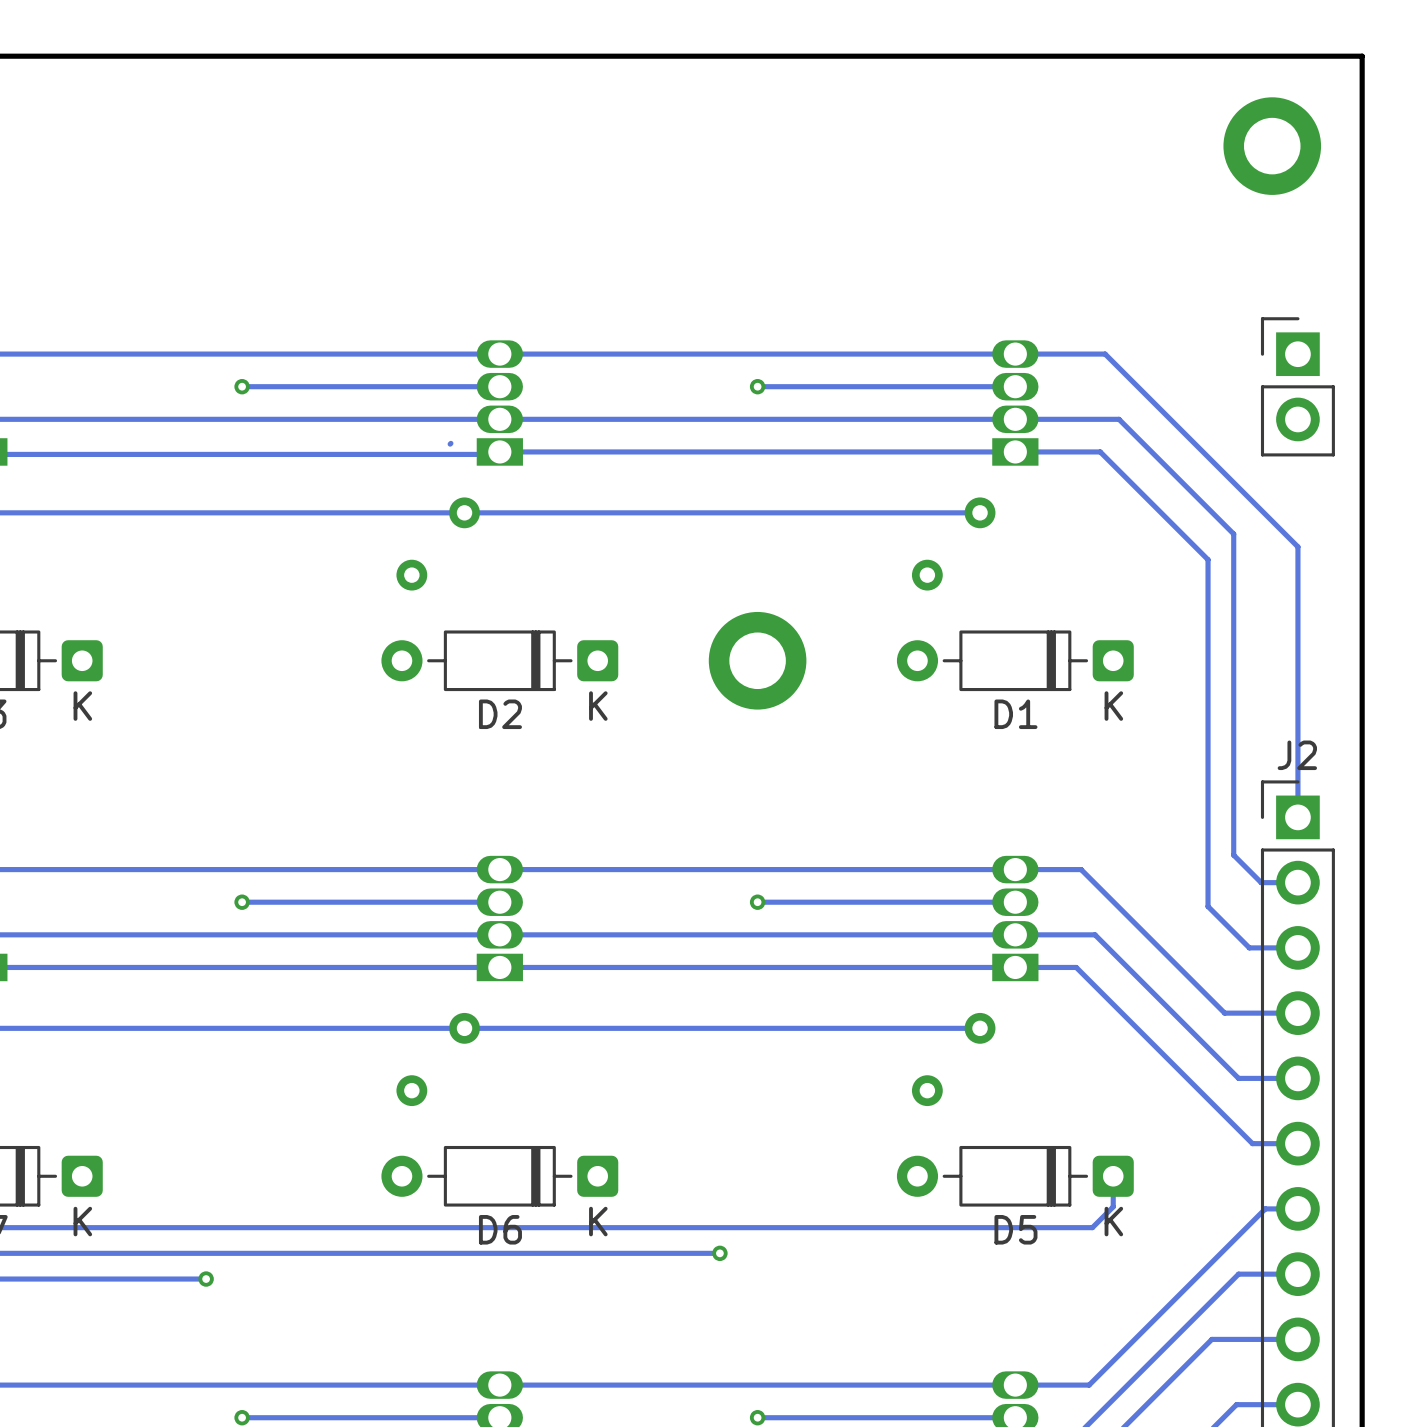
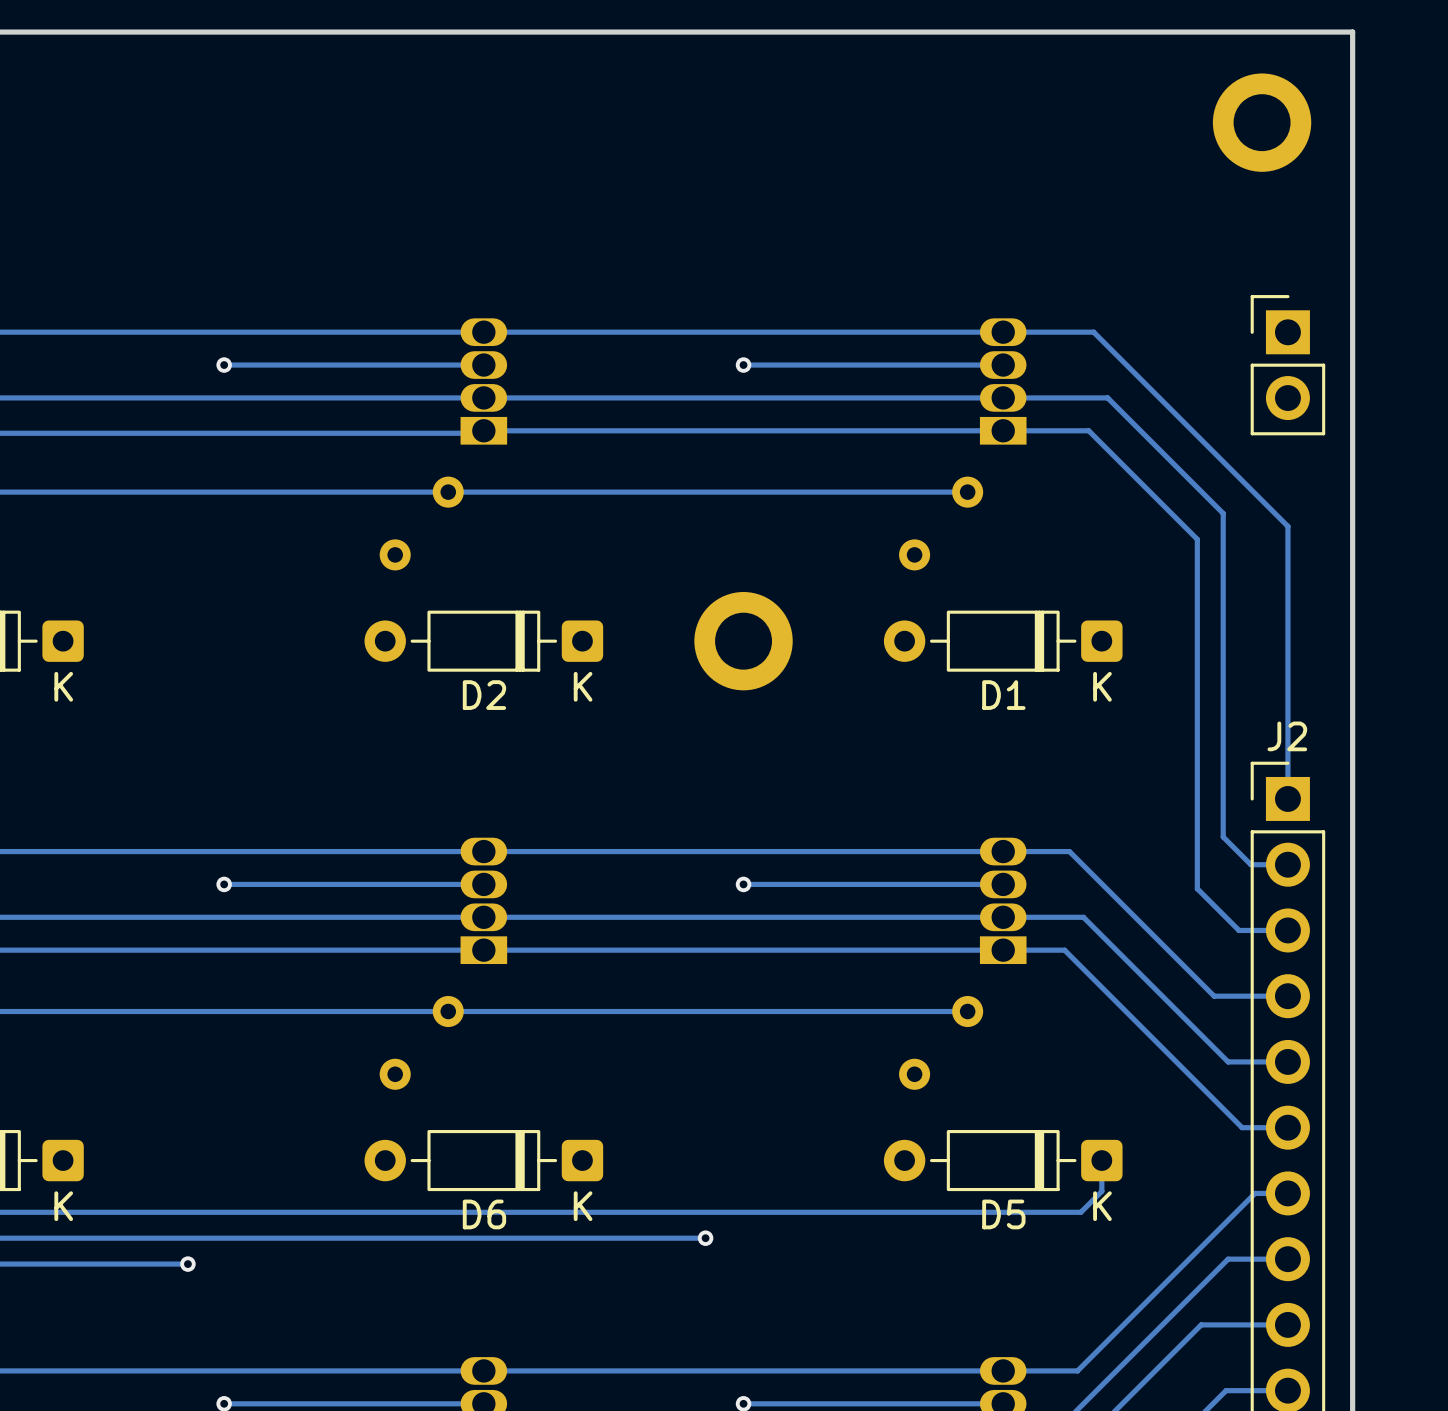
track: (450, 443) (450, 444) -> none

